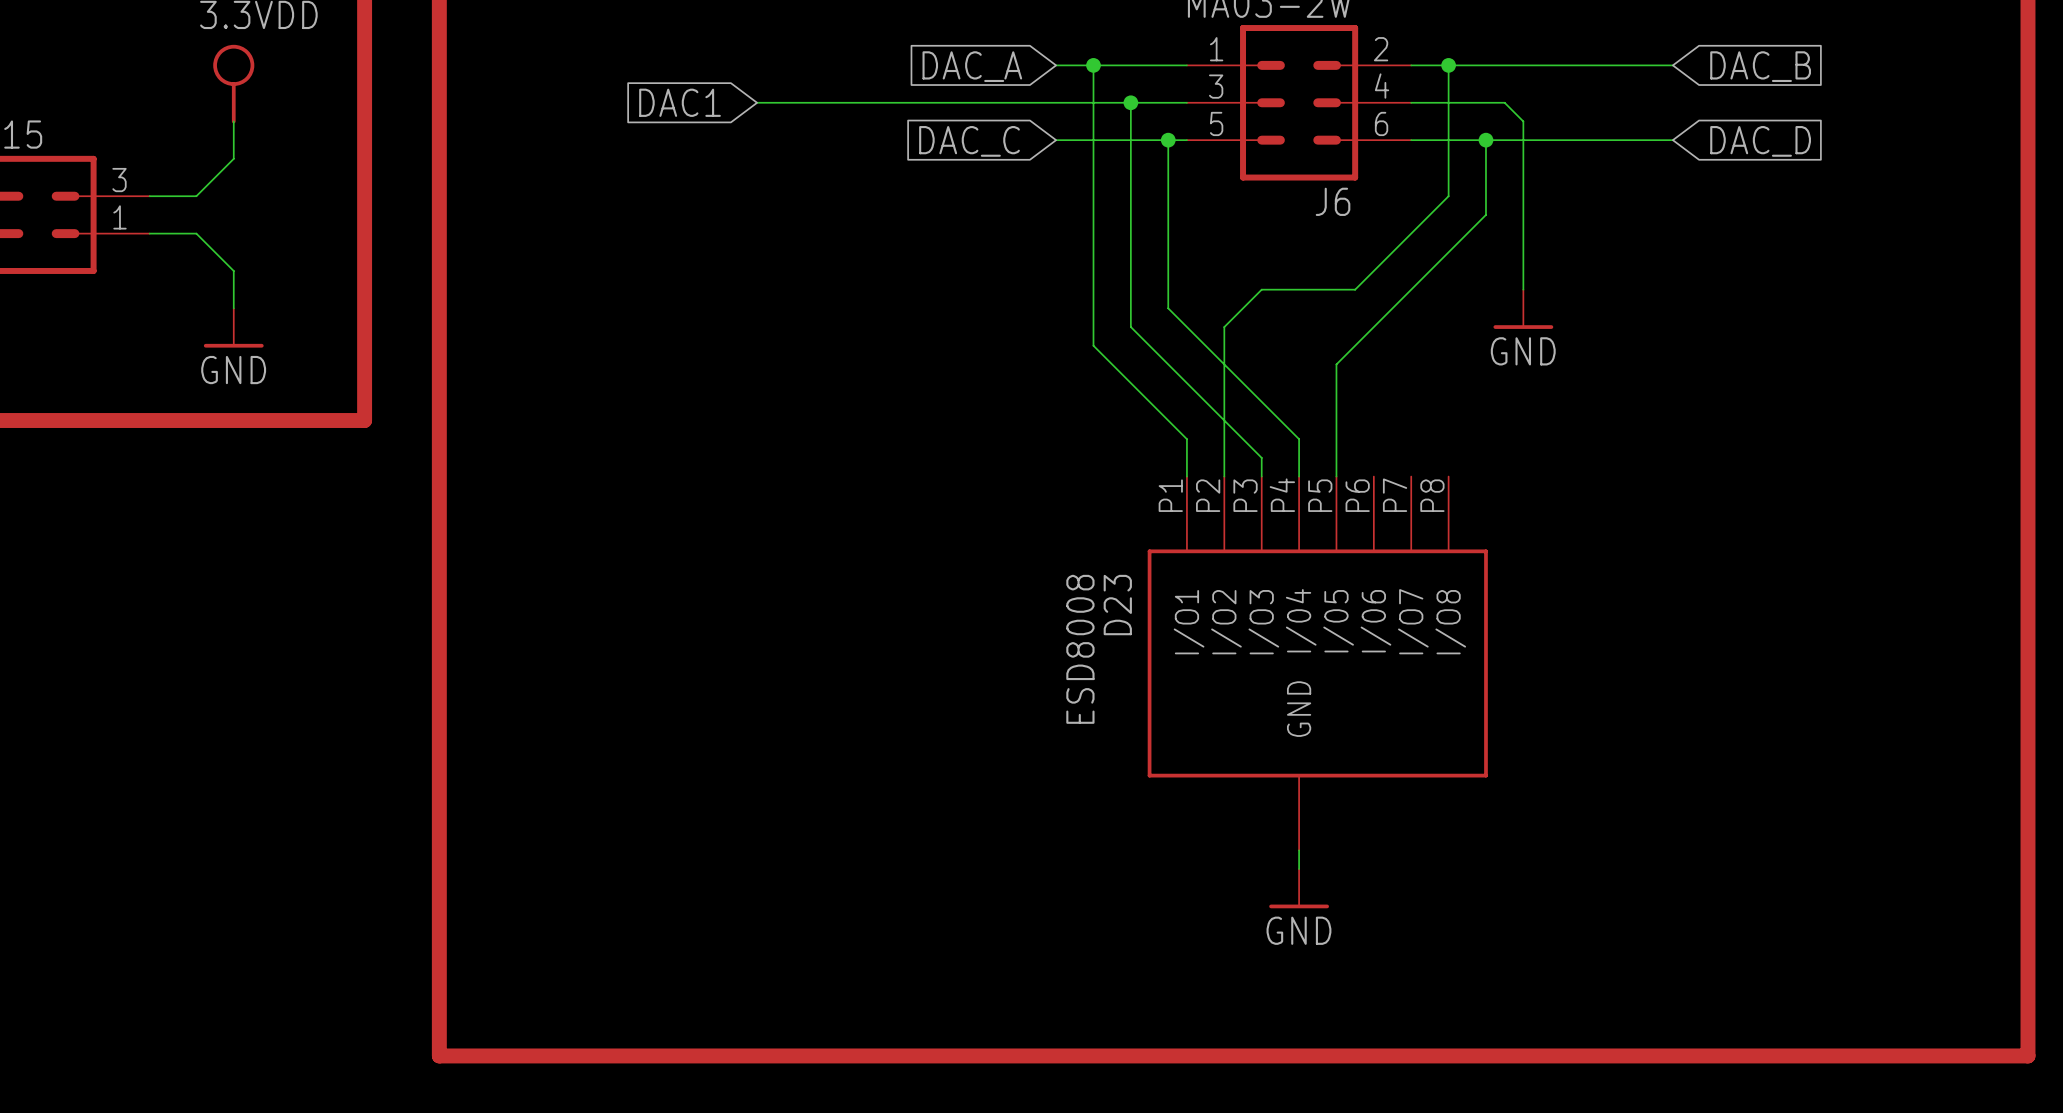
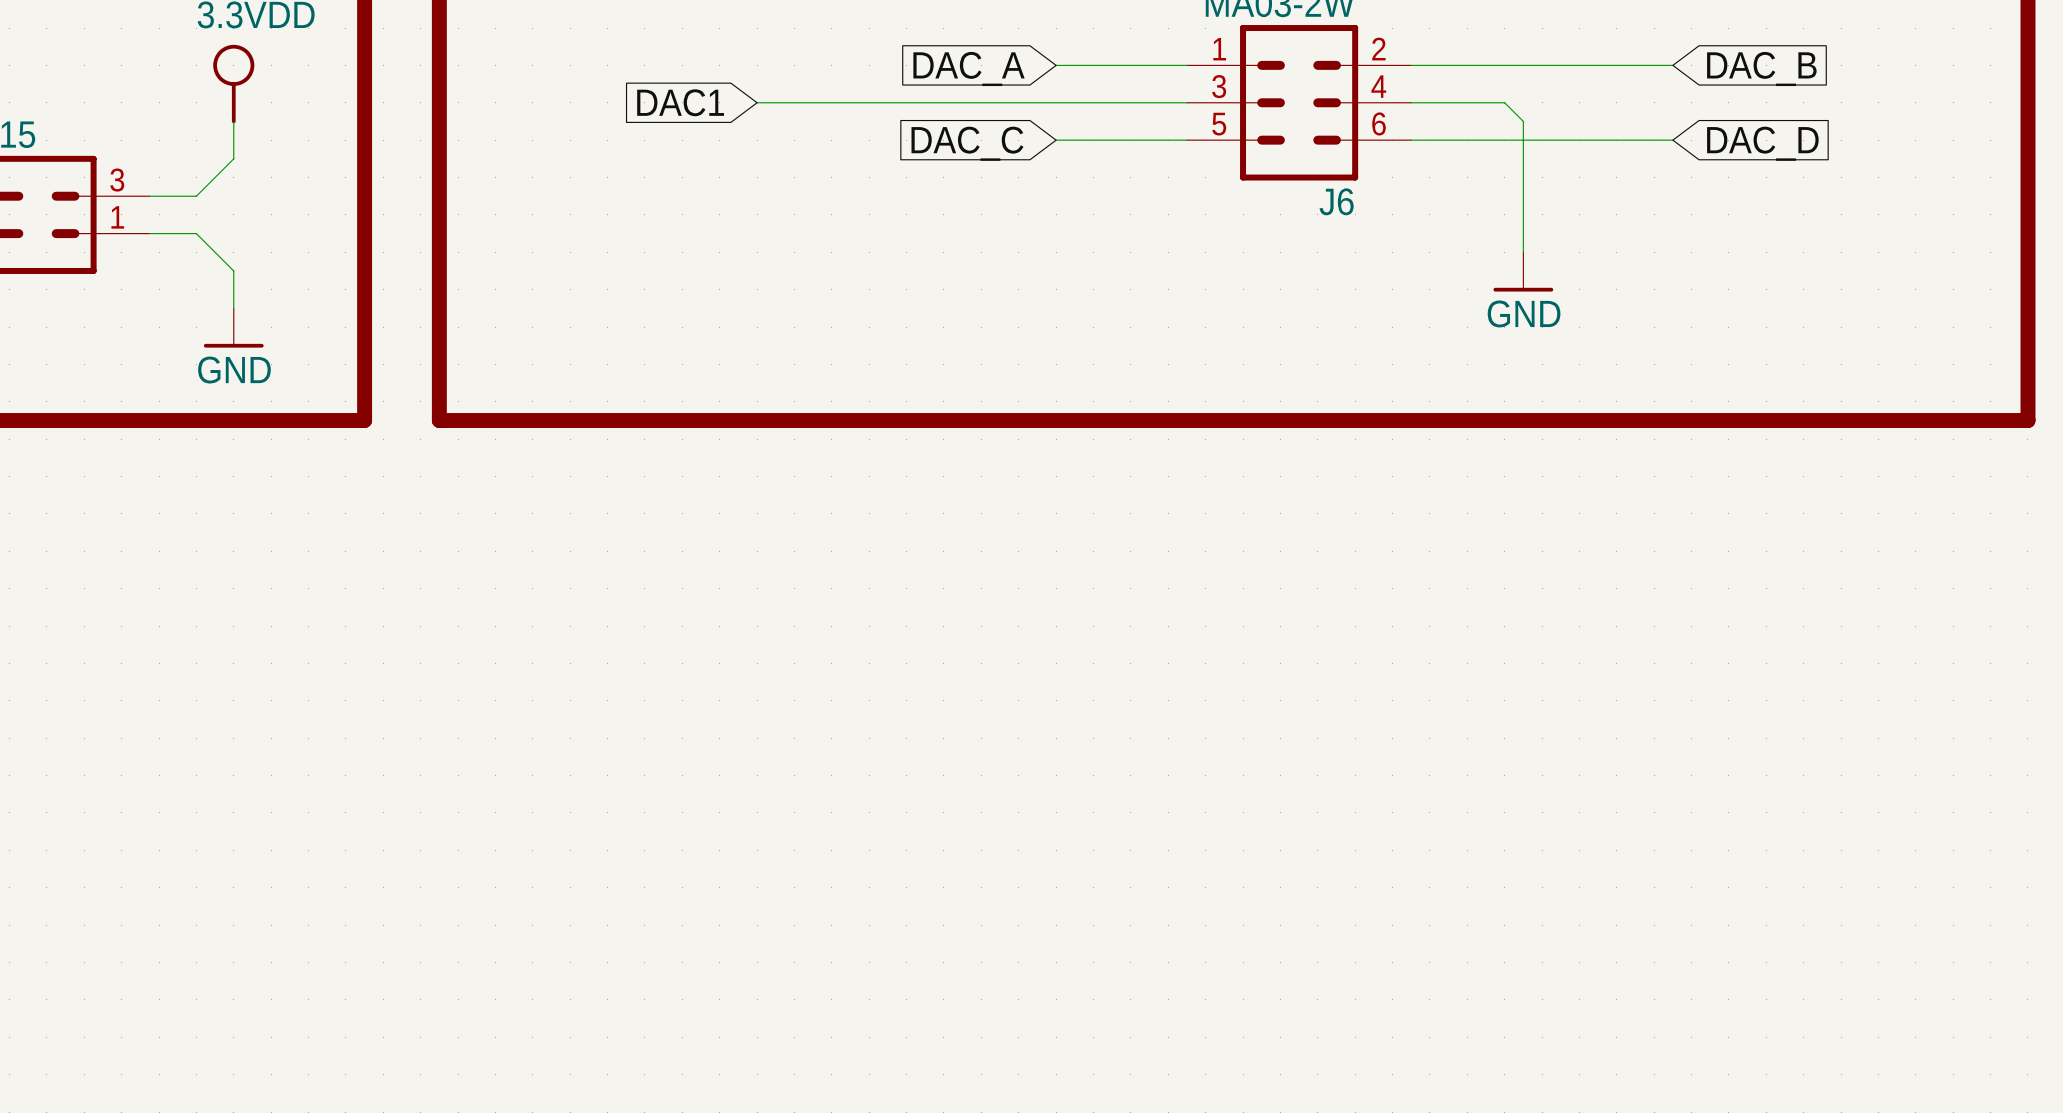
wire: (1093, 65) (1093, 345) (1186, 439) (1186, 476) -> none
junction: (1093, 65) -> none
wire: (1448, 65) (1448, 196) (1355, 289) (1261, 289) (1224, 327) (1224, 476) -> none
junction: (1448, 65) -> none
wire: (1130, 102) (1130, 327) (1261, 457) (1261, 476) -> none
junction: (1130, 102) -> none
wire: (1168, 140) (1168, 308) (1299, 439) (1299, 476) -> none
junction: (1168, 140) -> none
wire: (1485, 140) (1485, 214) (1336, 364) (1336, 476) -> none
junction: (1485, 140) -> none
power symbol position: GND (1523, 309) -> GND (1523, 271)
line: (439, 420) (439, 1055) (2027, 1055) (2027, 420) -> (439, 420) (2027, 420)
D23: ESD8008 (1317, 663) -> none
wire: (1299, 850) (1299, 869) -> none
power symbol: GND (1299, 888) -> none

